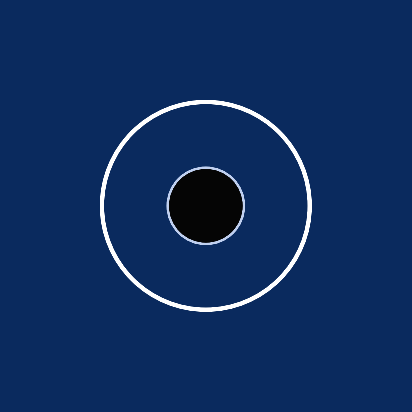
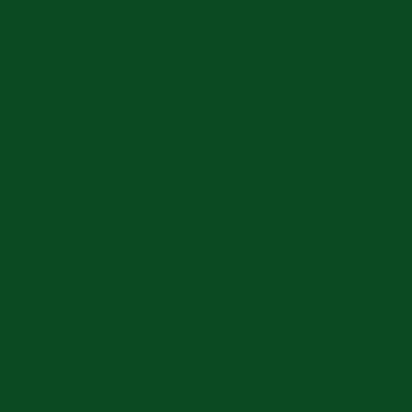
part: (205, 205) -> none

